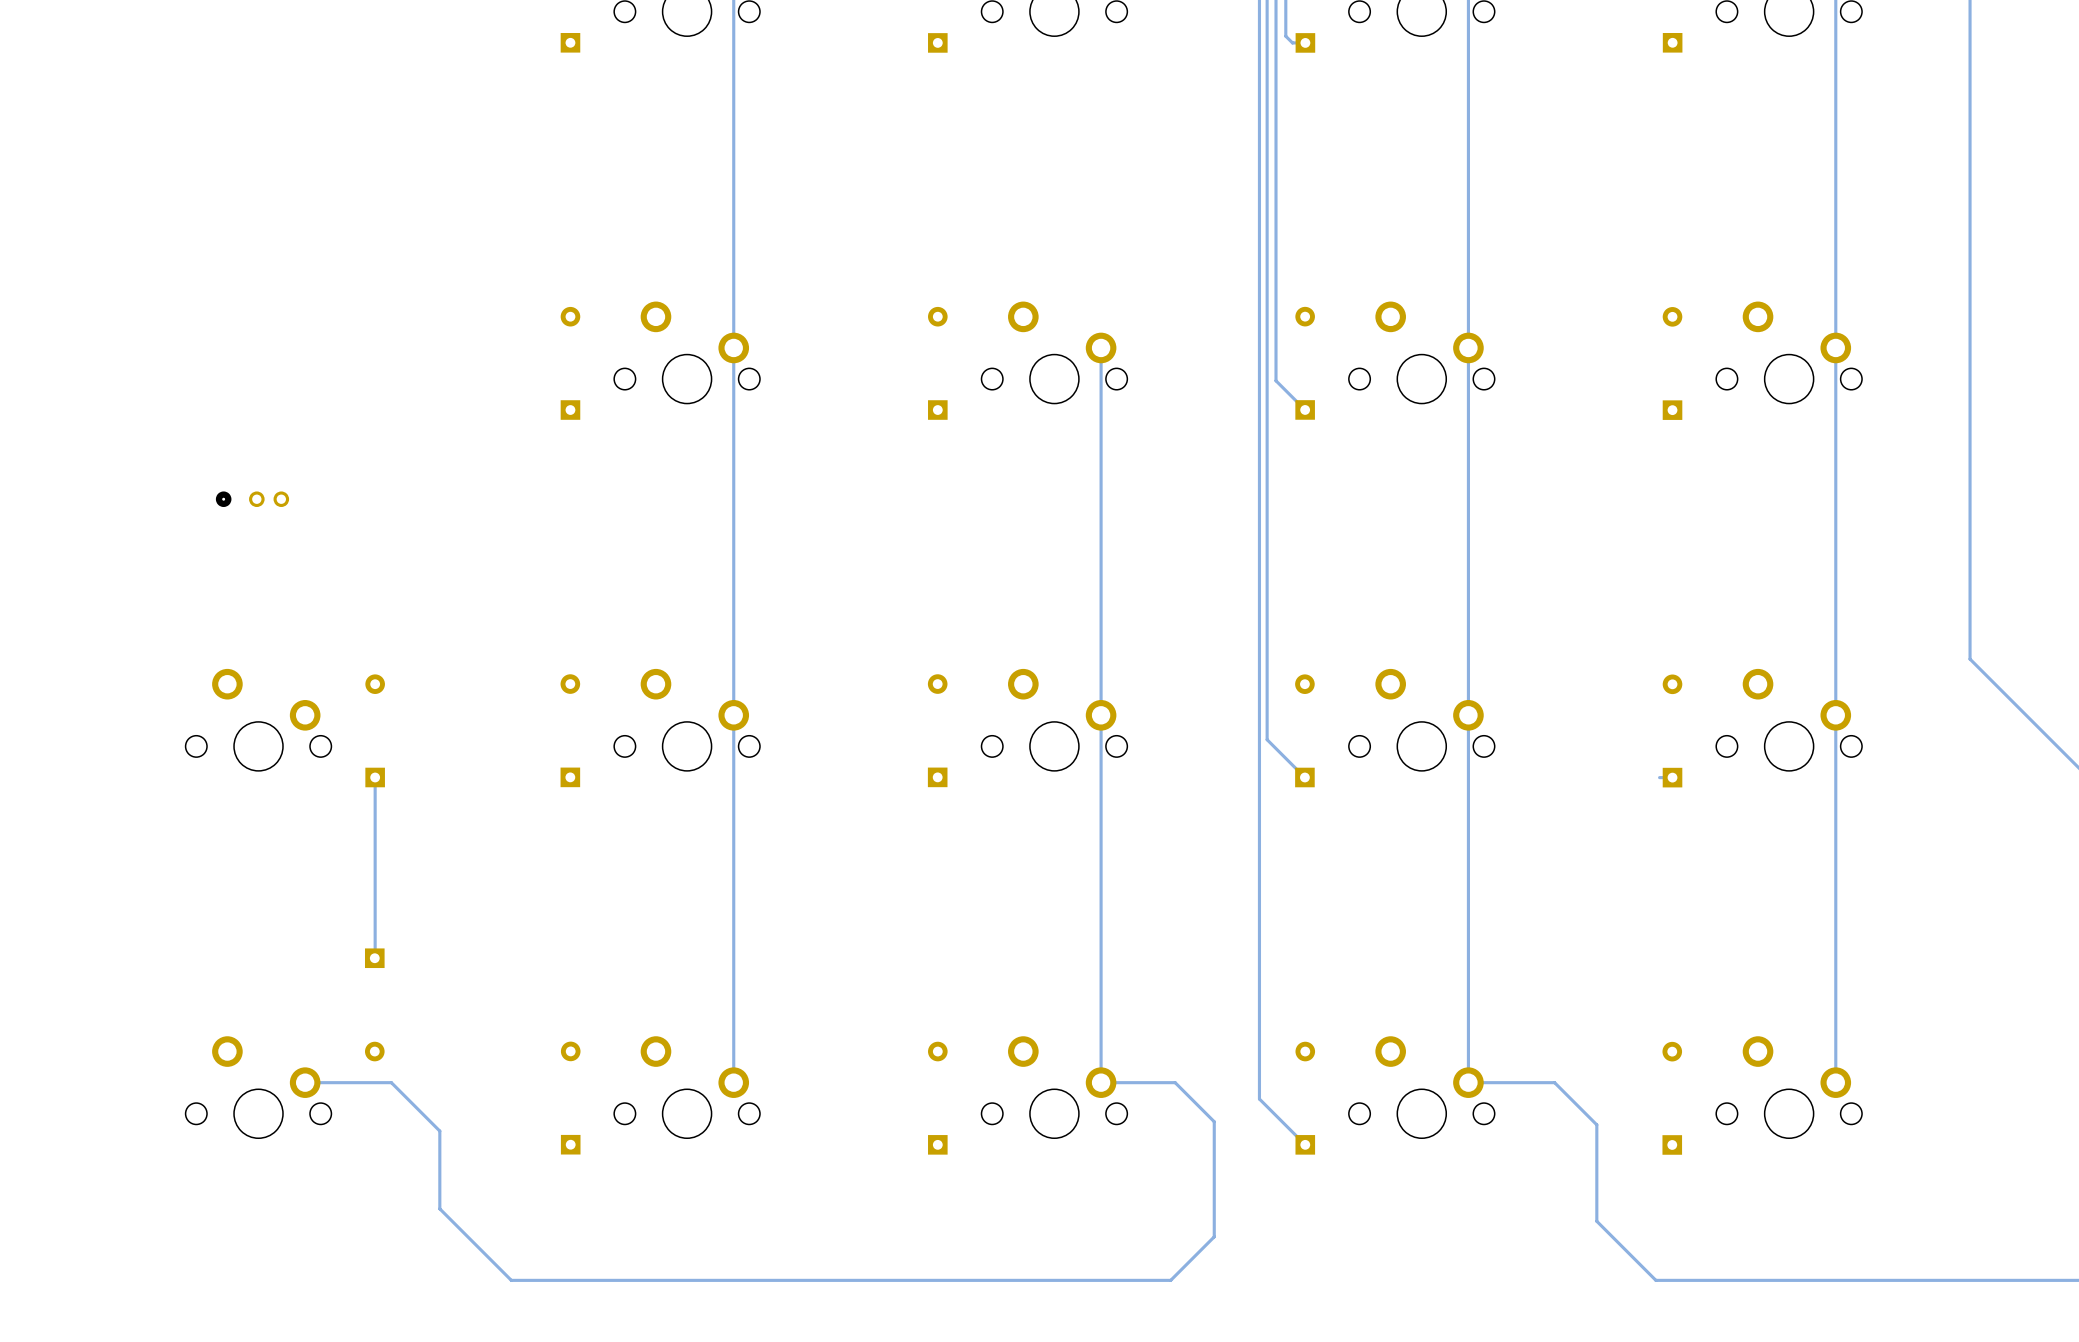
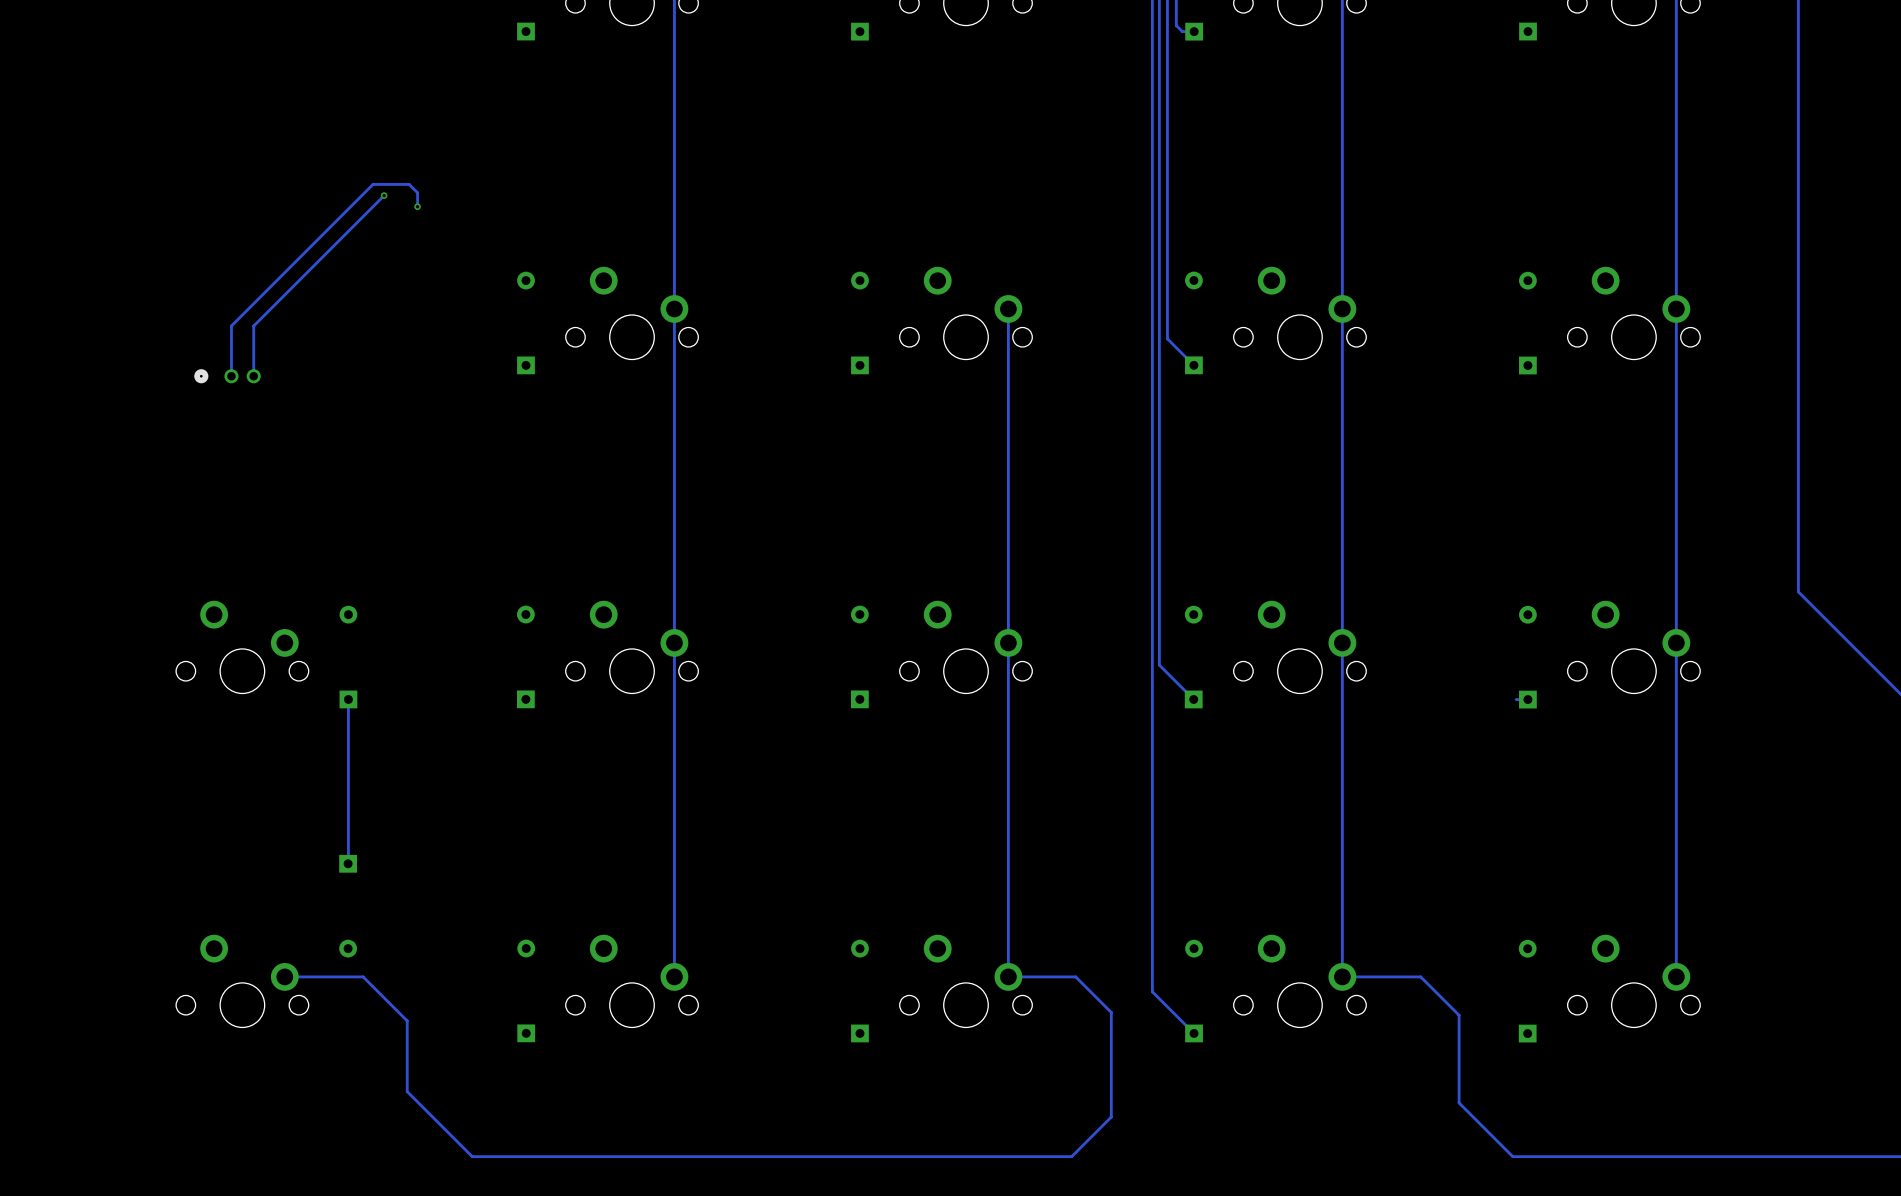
track: none -> (384, 195) (253, 325) (253, 376)
via: none -> (384, 195)
track: none -> (417, 206) (417, 192) (409, 184) (373, 184) (231, 325) (231, 376)
via: none -> (417, 206)
part position: (252, 499) -> (227, 376)

